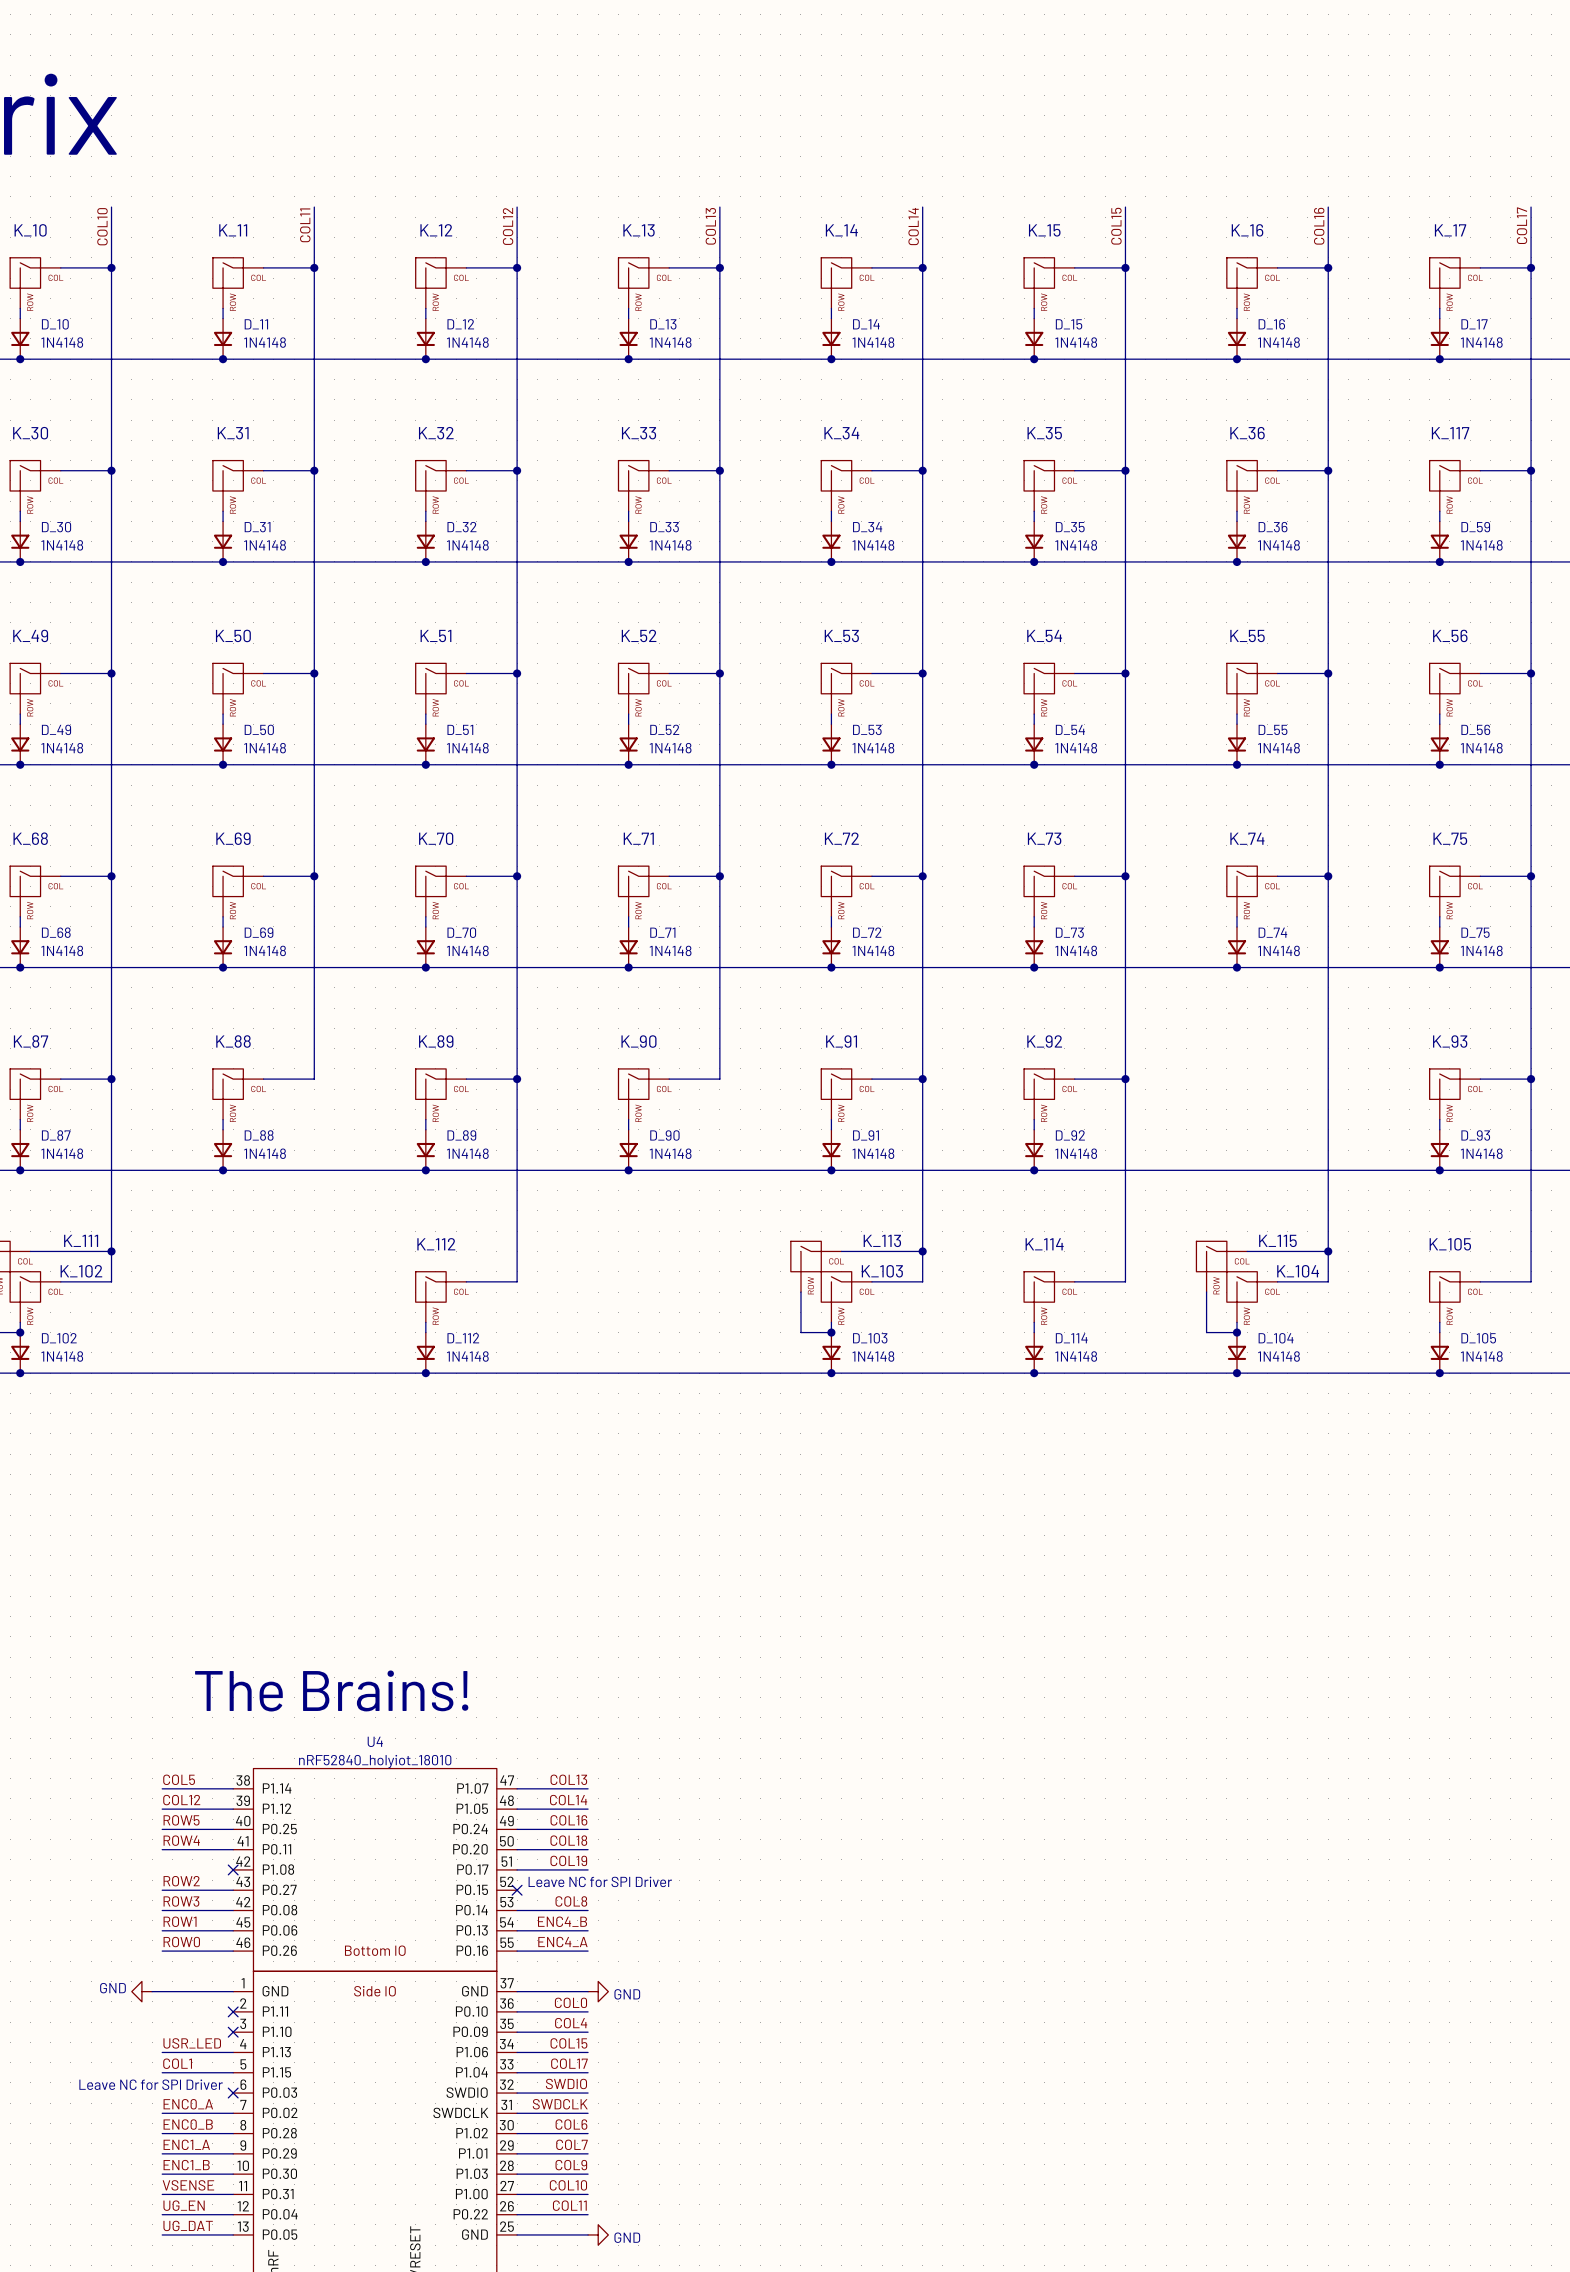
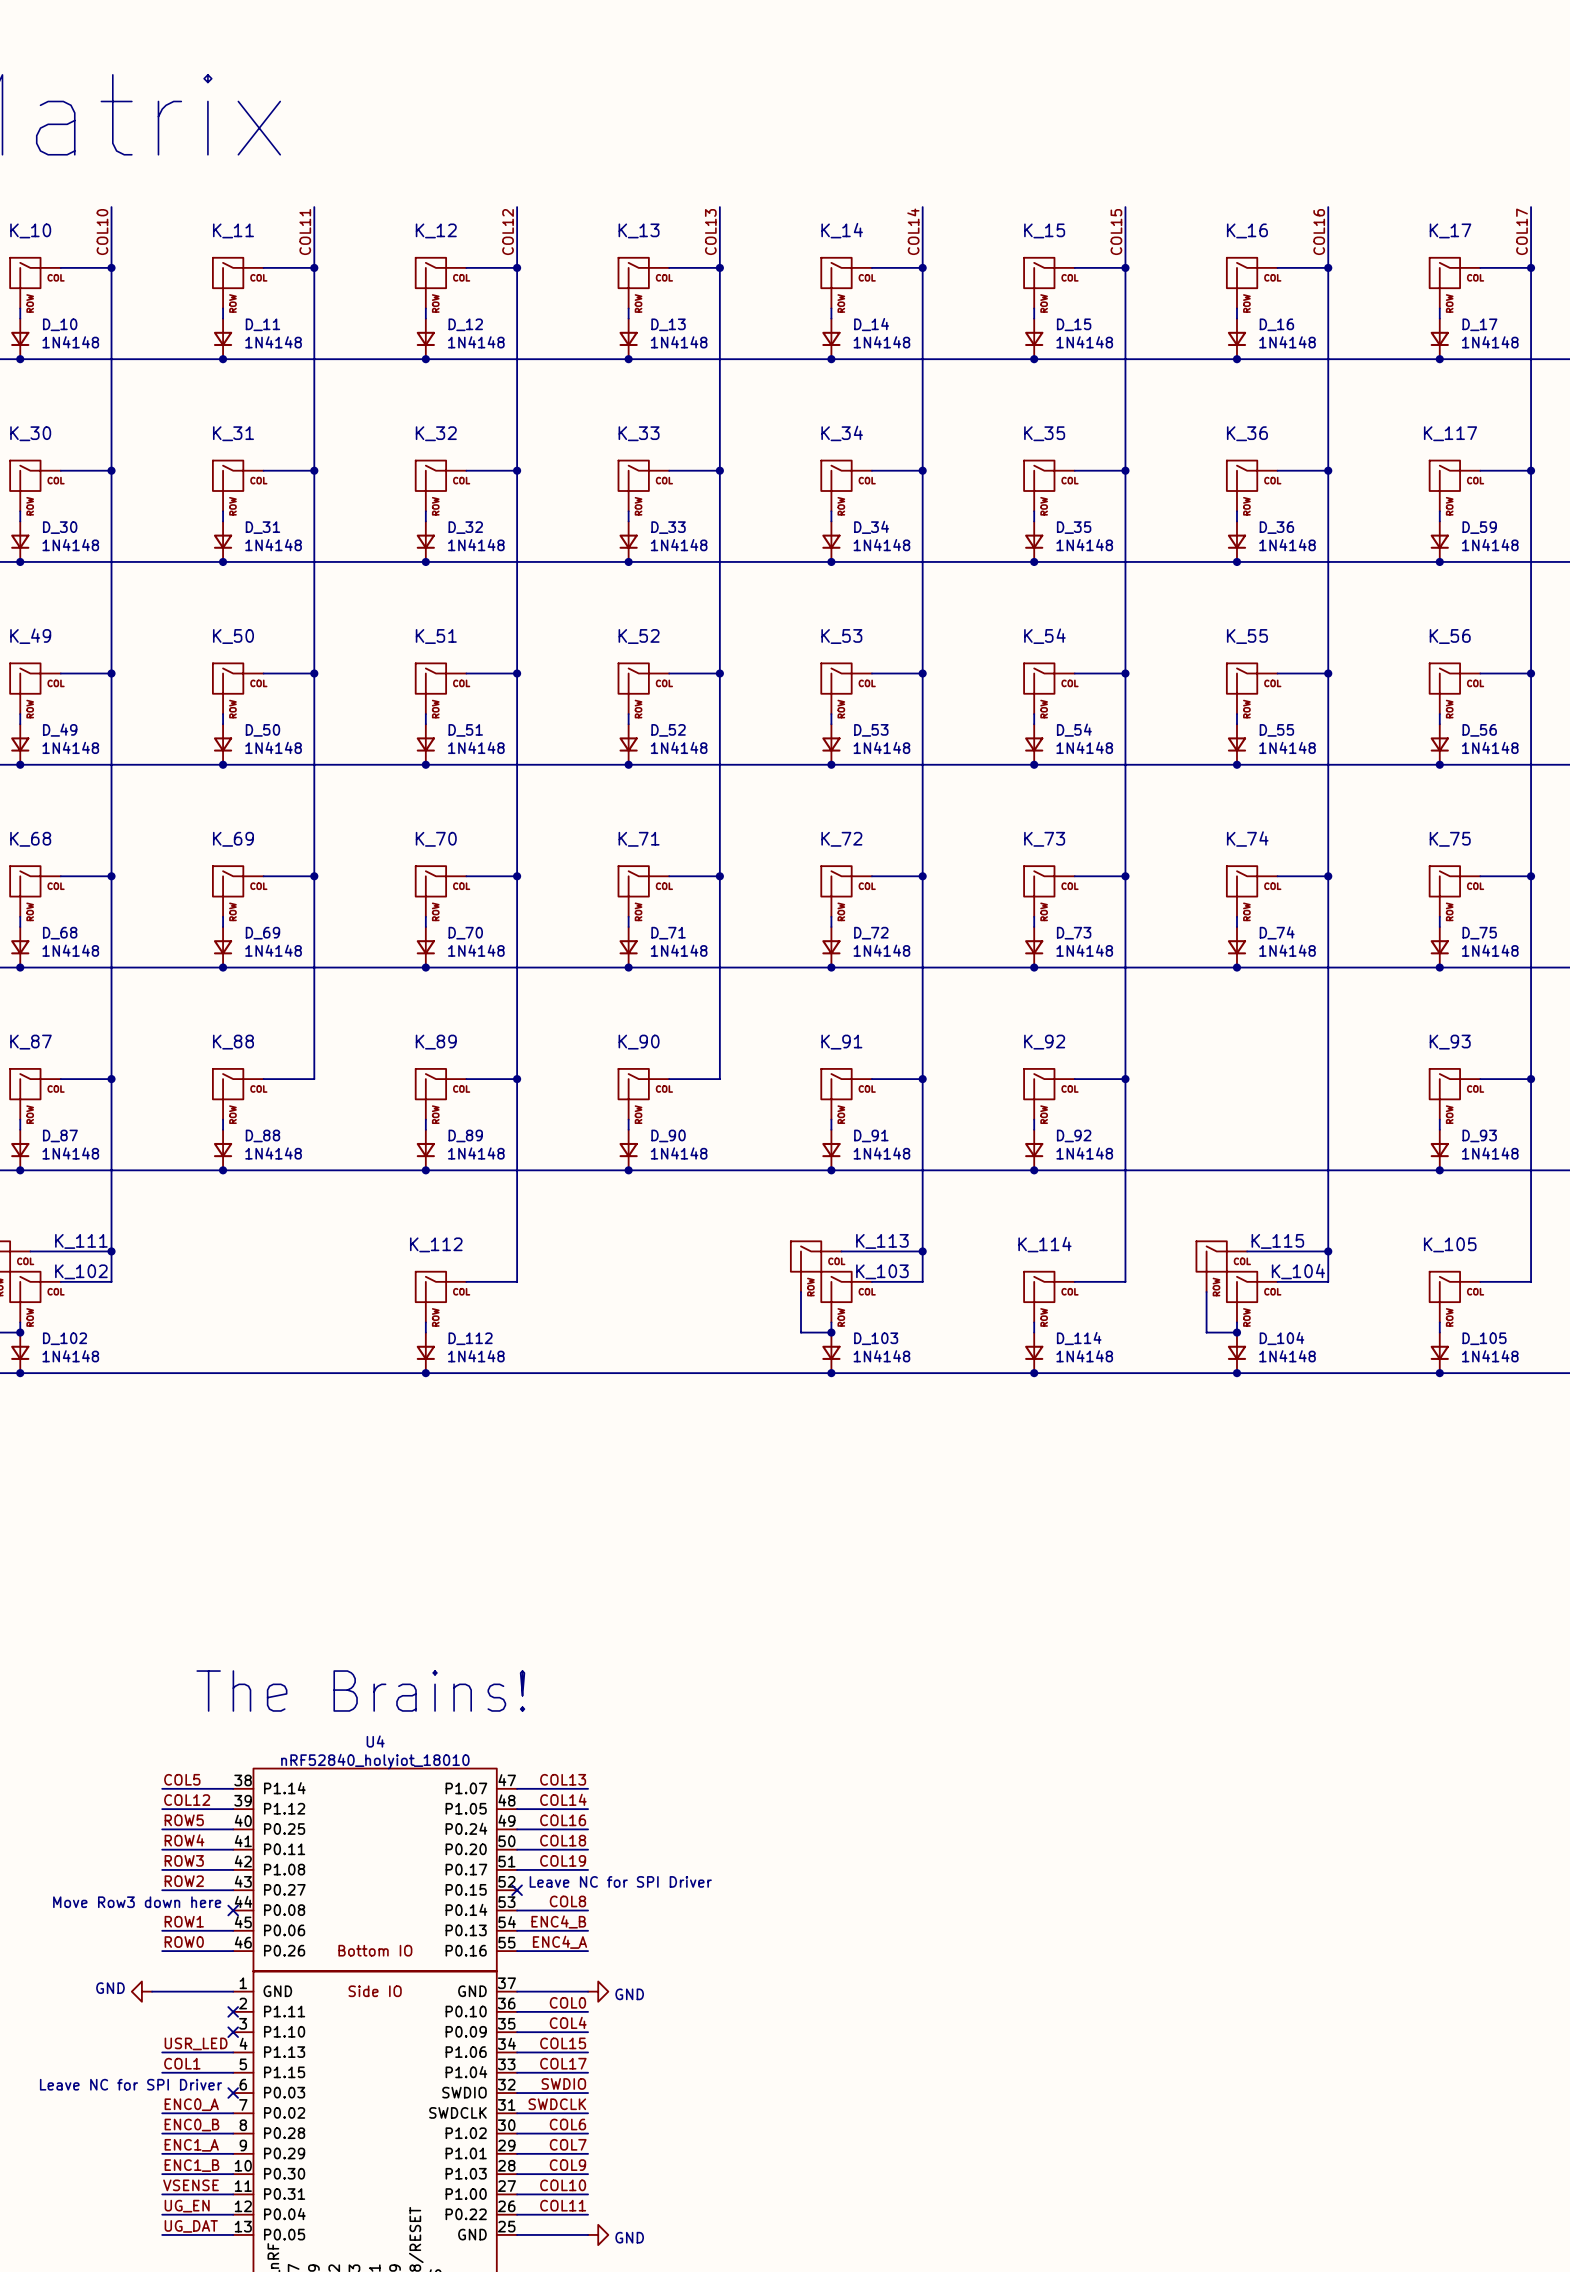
no-connect mark position: (233, 1869) -> (233, 1910)
label position: ROW3 (181, 1901) -> ROW3 (184, 1860)
text: none -> Move Row3 down here (137, 1902)
U4 pin number: 42 (243, 1902) -> 44 (243, 1901)
wire: (162, 1910) (233, 1910) -> (162, 1869) (233, 1869)

